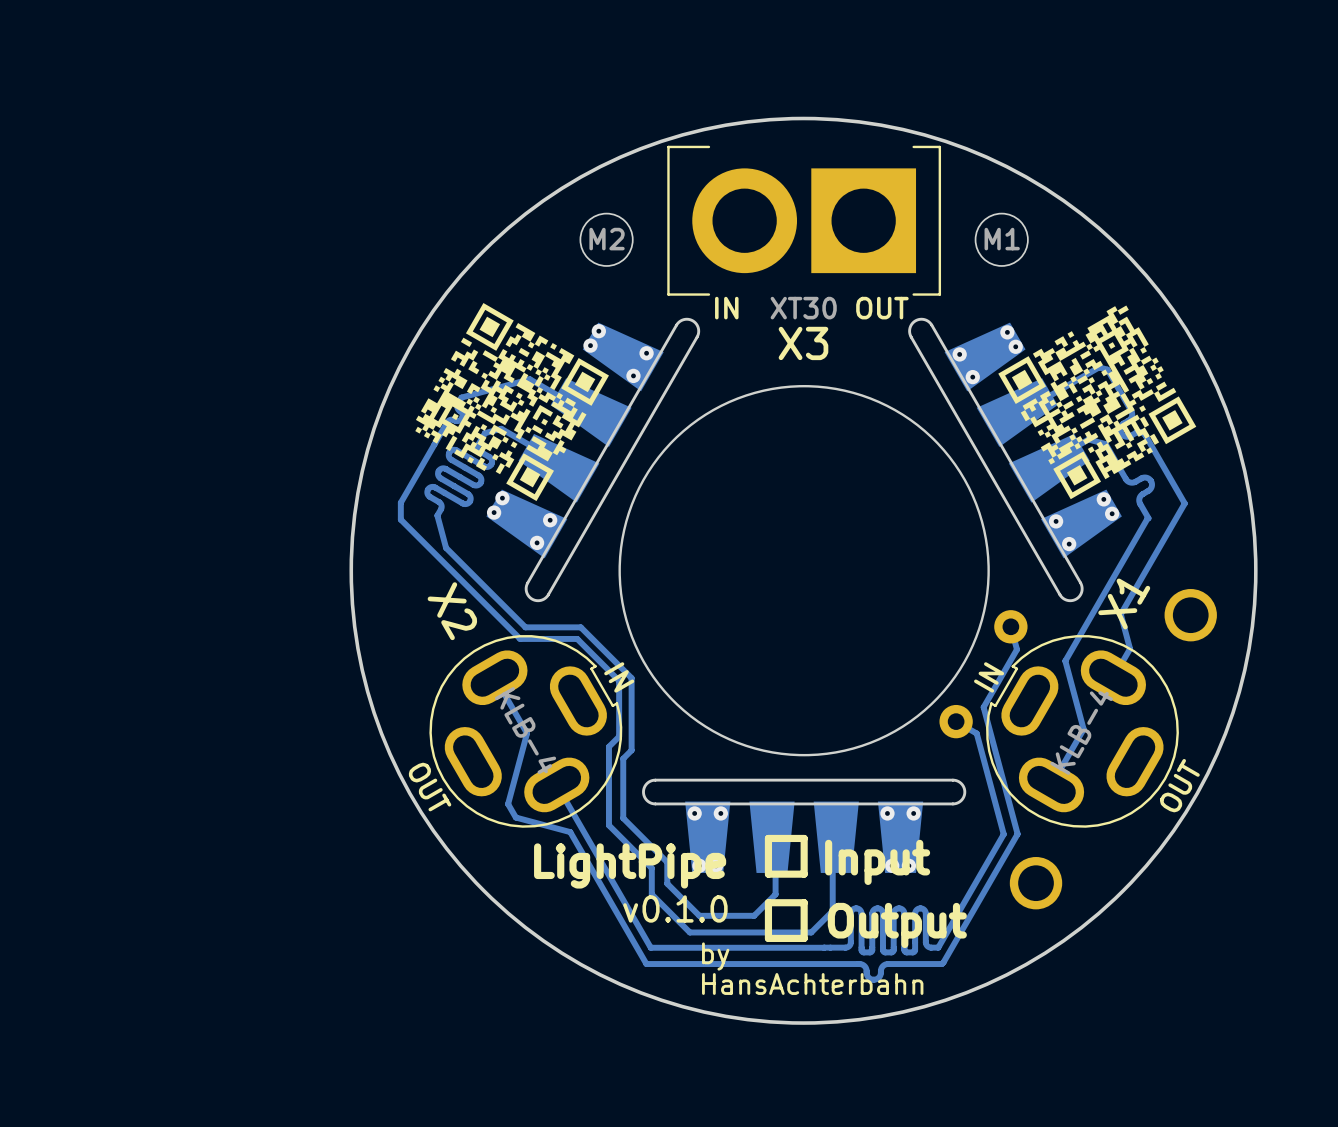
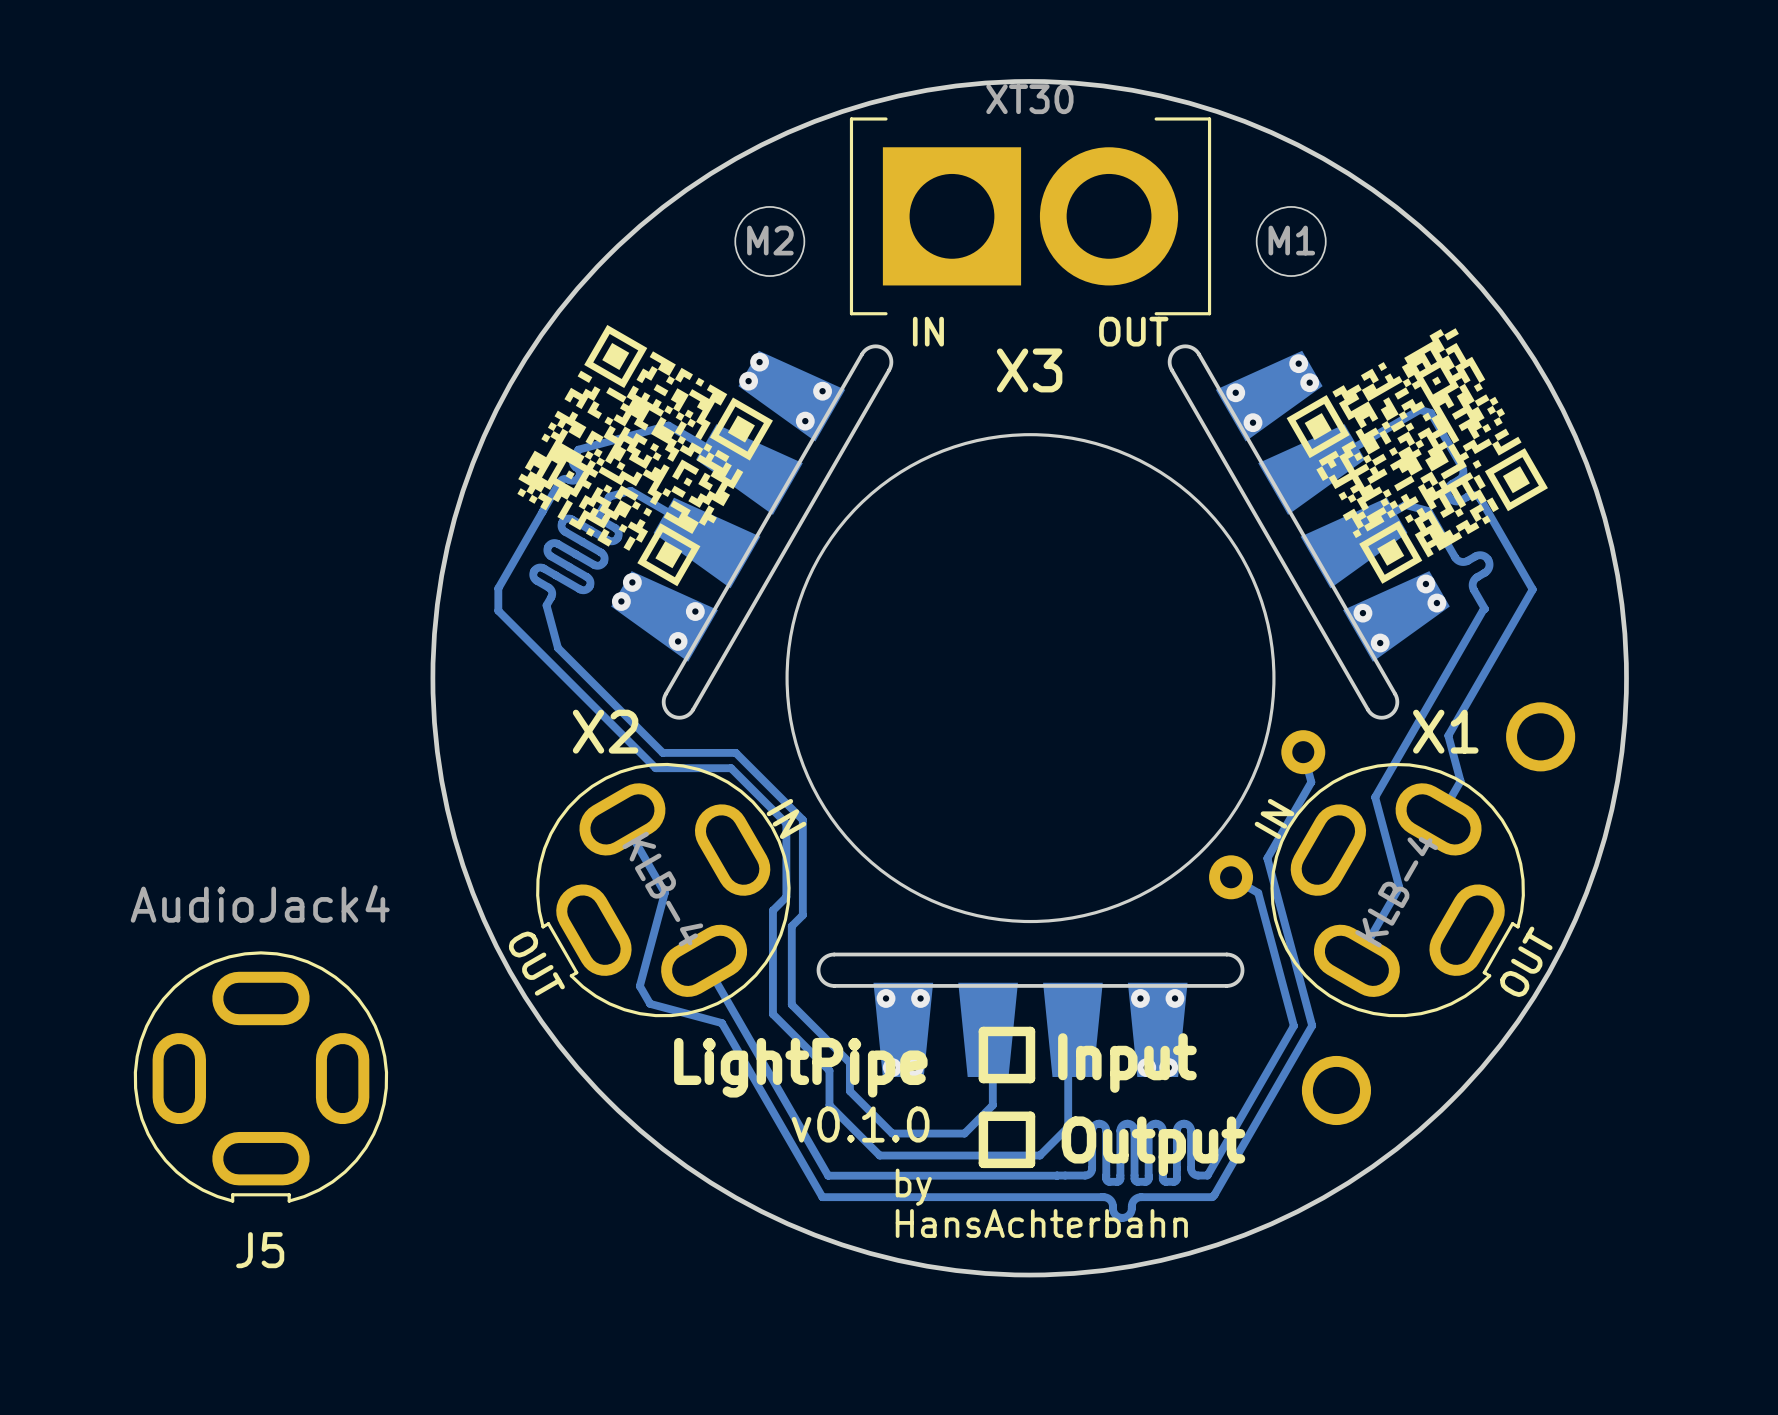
X3 rotation: 0° (804, 220) -> 180° (1030, 216)
X2 rotation: 0° (525, 731) -> 180° (663, 890)
X1 rotation: 0° (1082, 731) -> 180° (1397, 890)
J5: none -> AudioJack4 (260, 1076)

